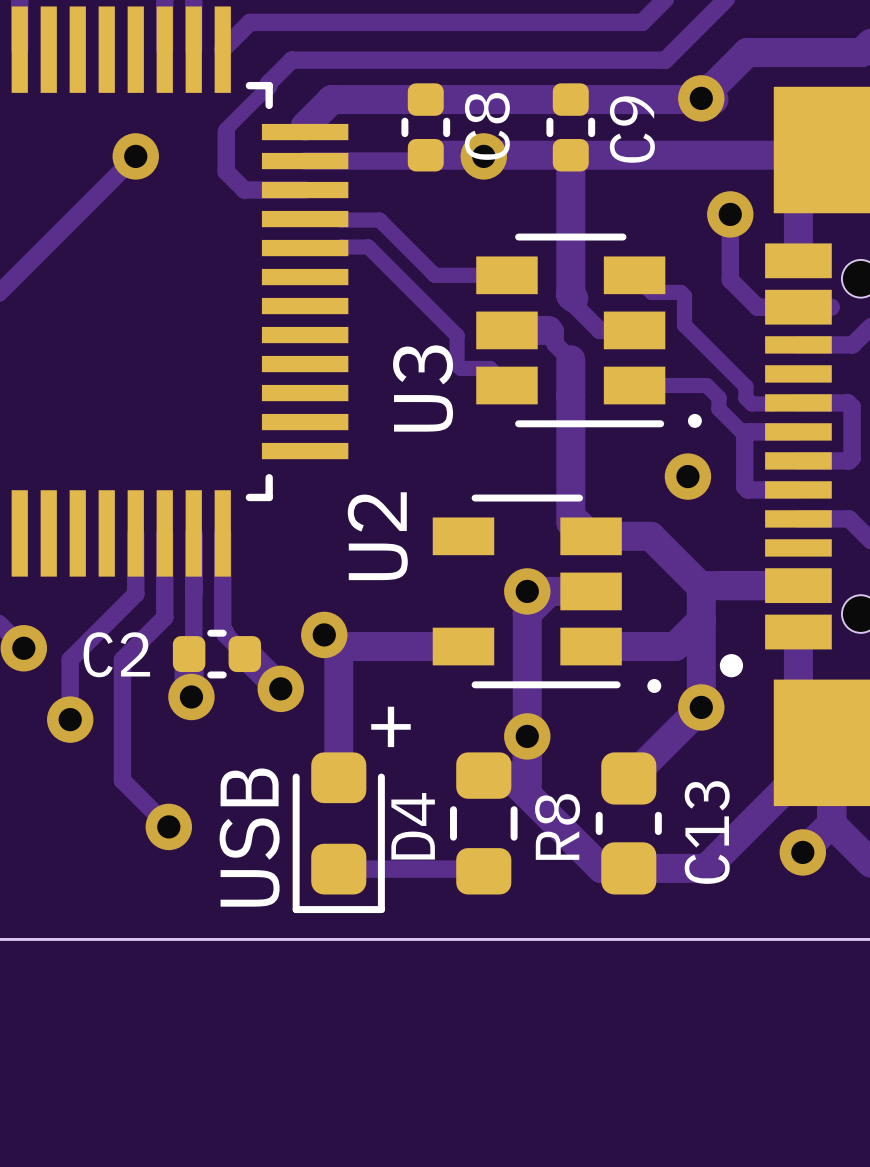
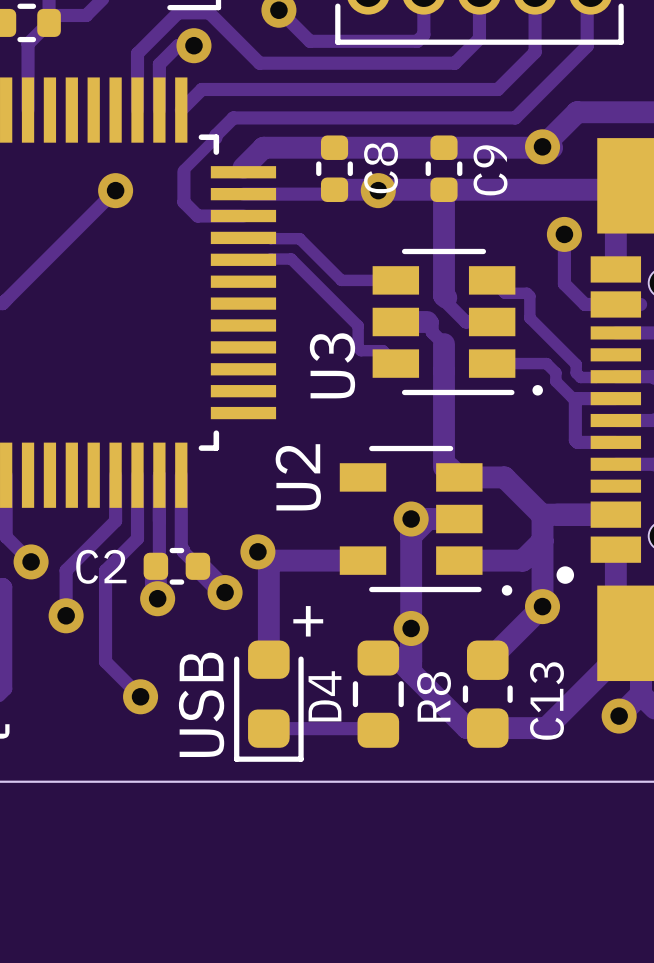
via: (687, 476) -> none

